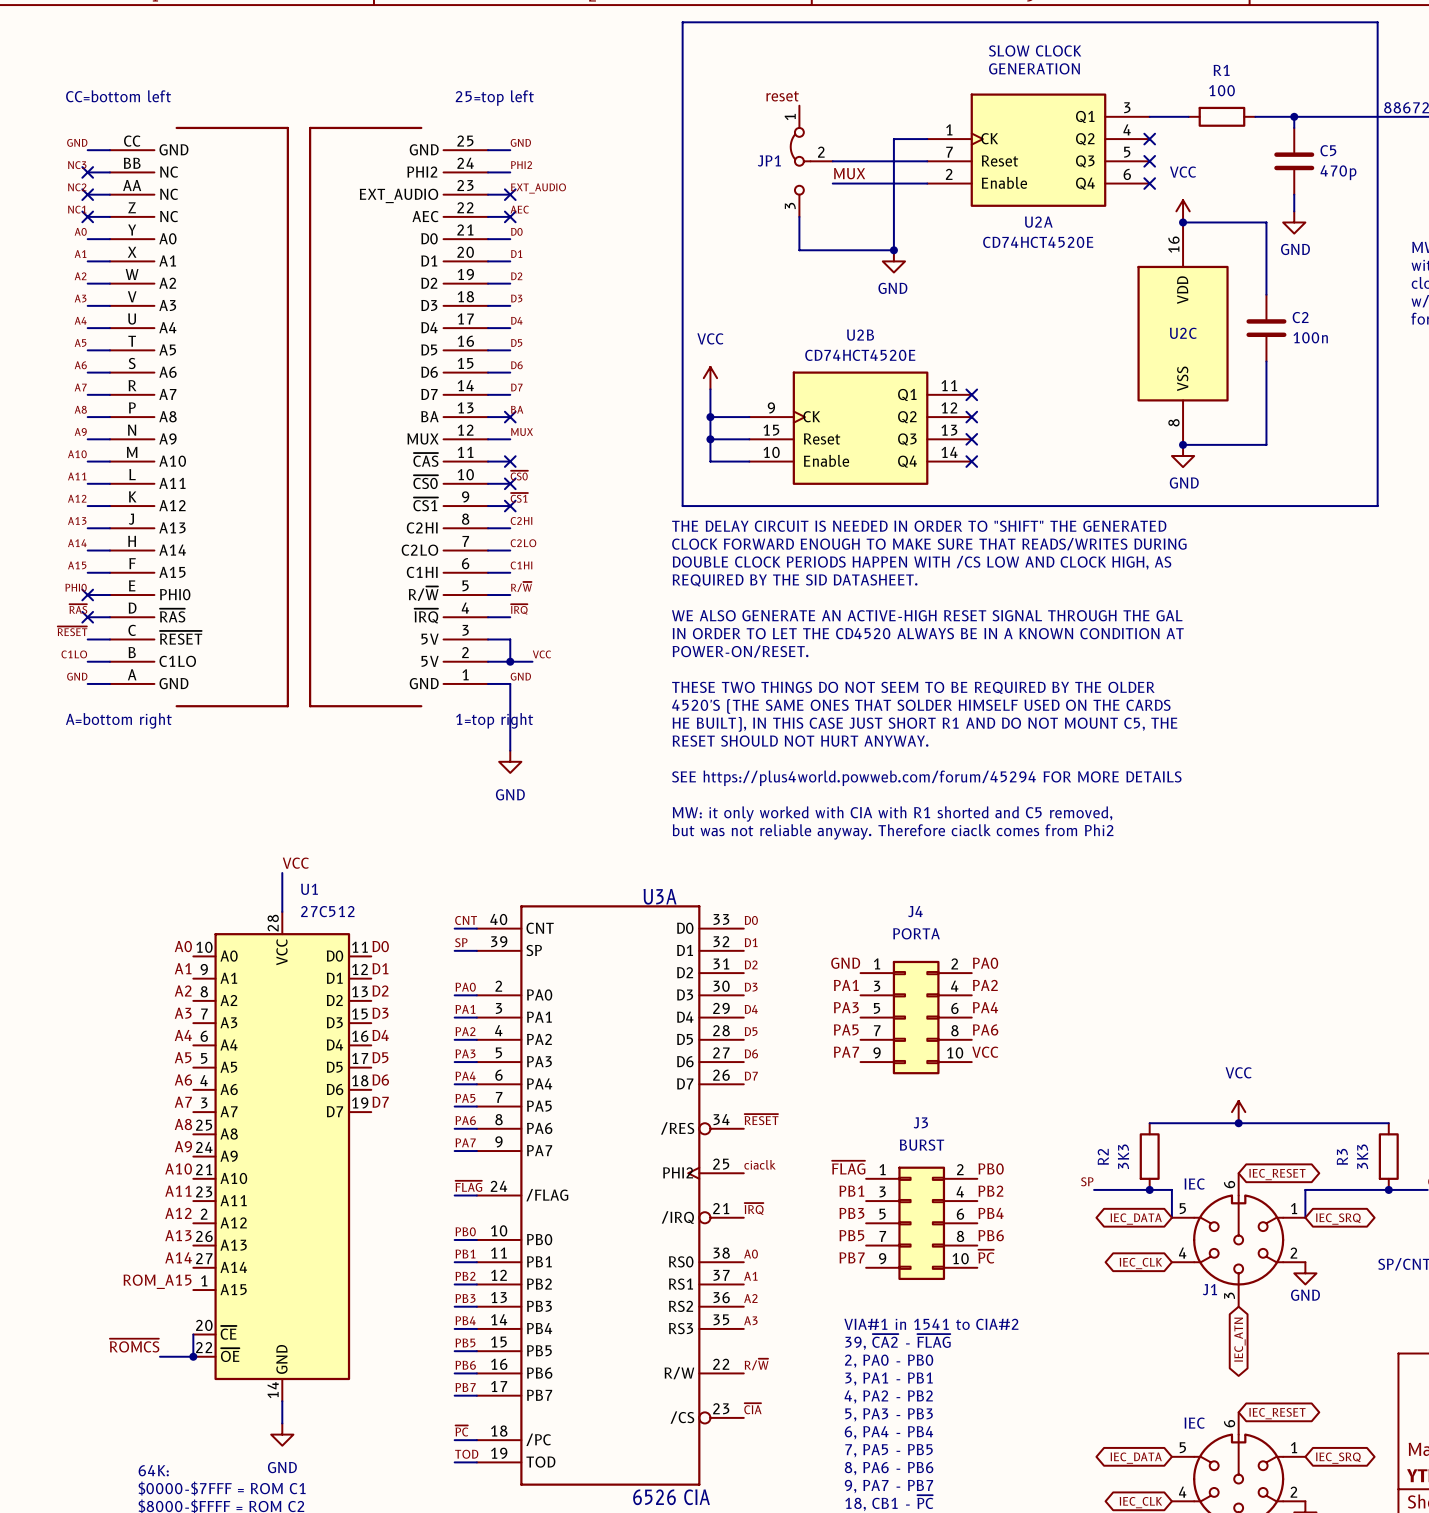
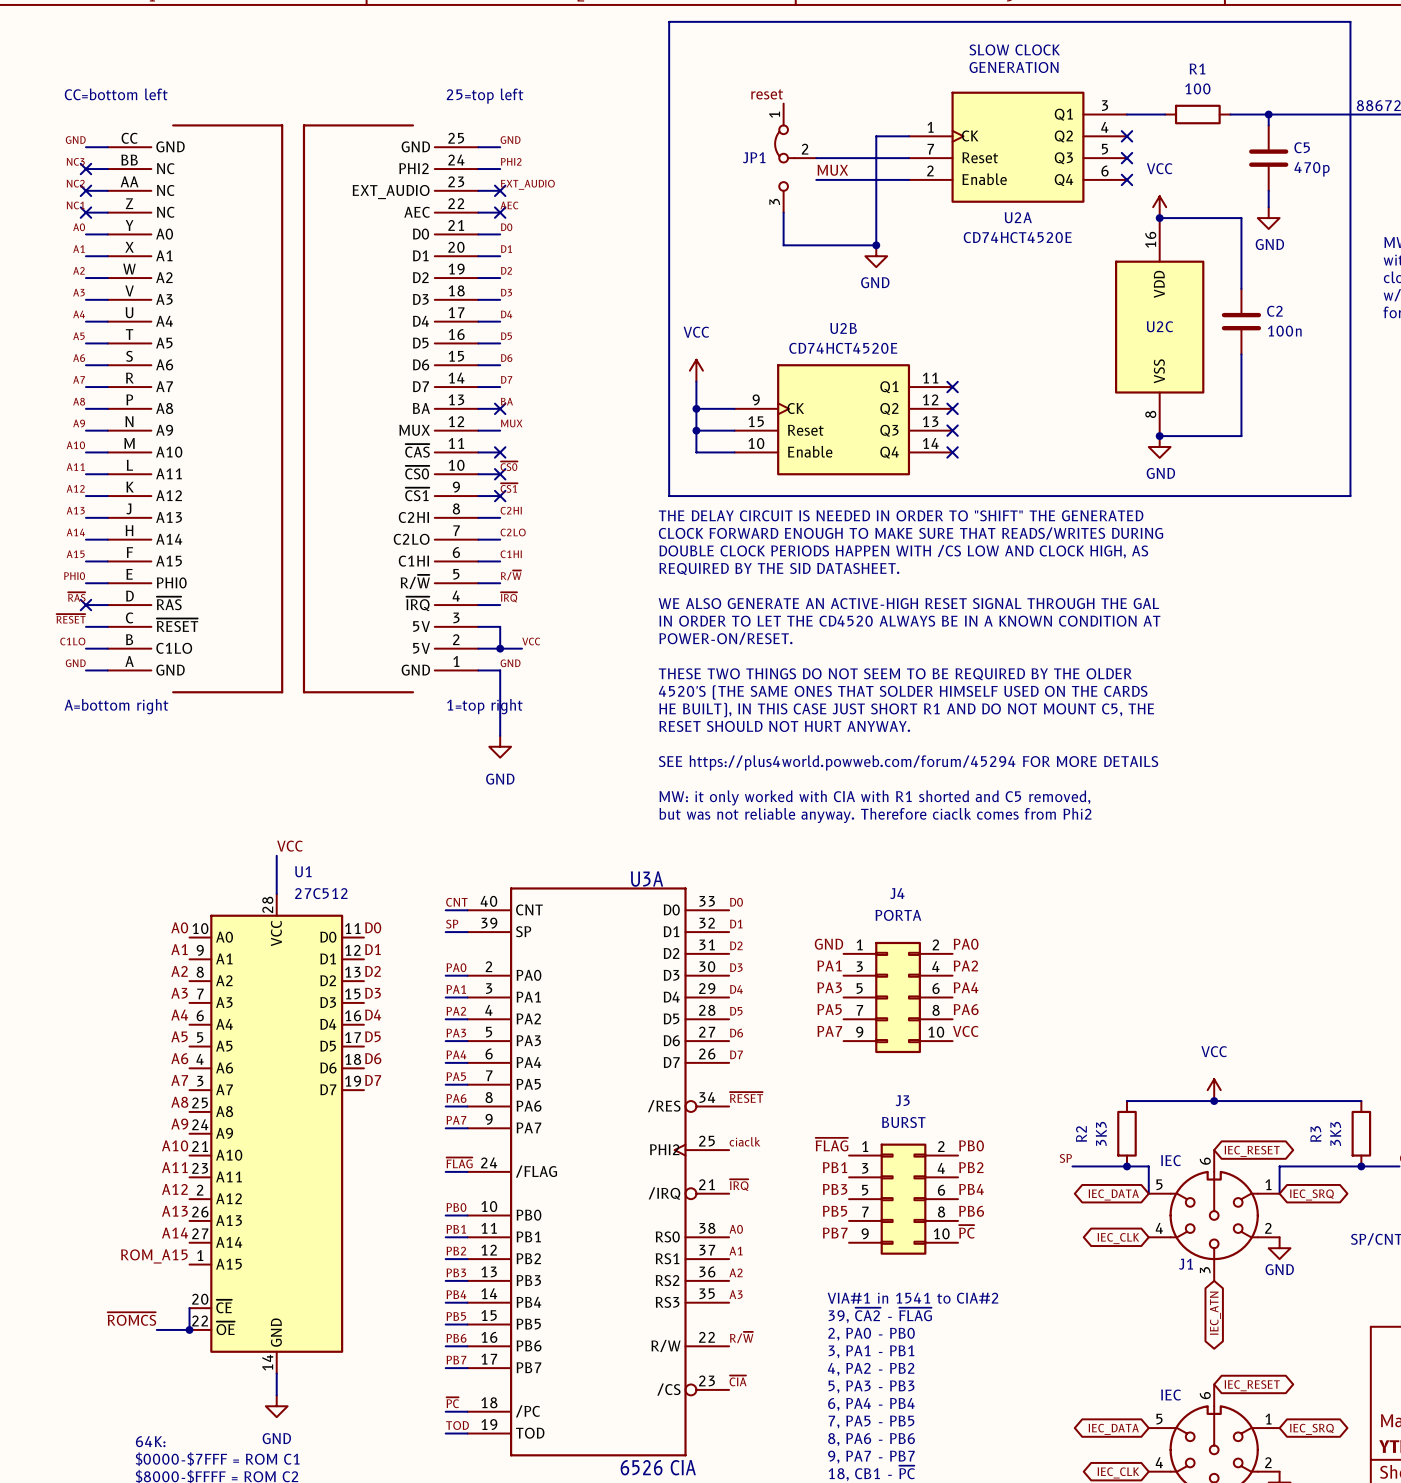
no-connect mark: (87, 595) -> none

